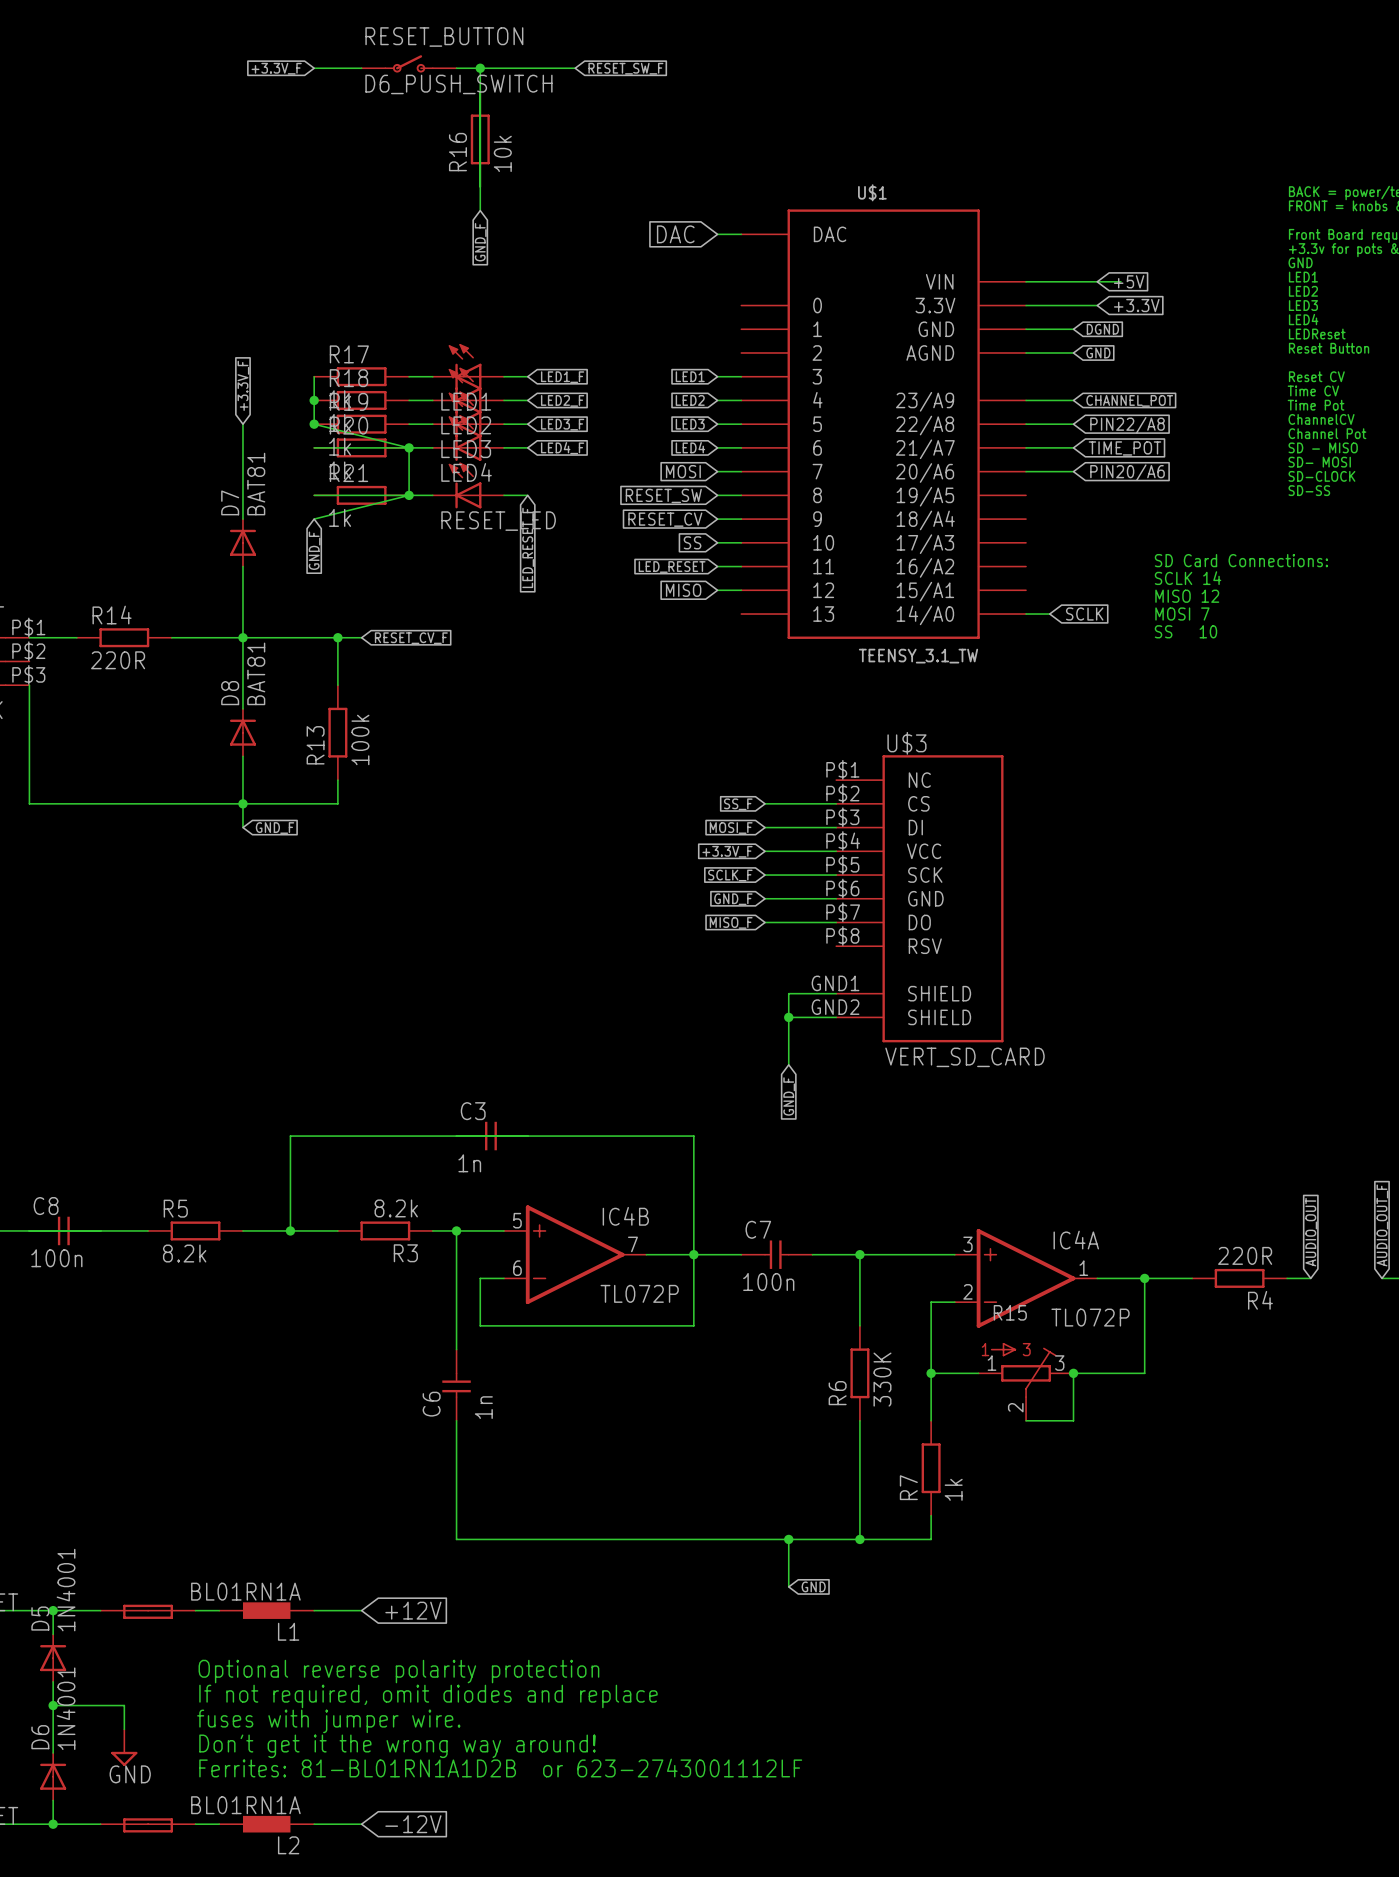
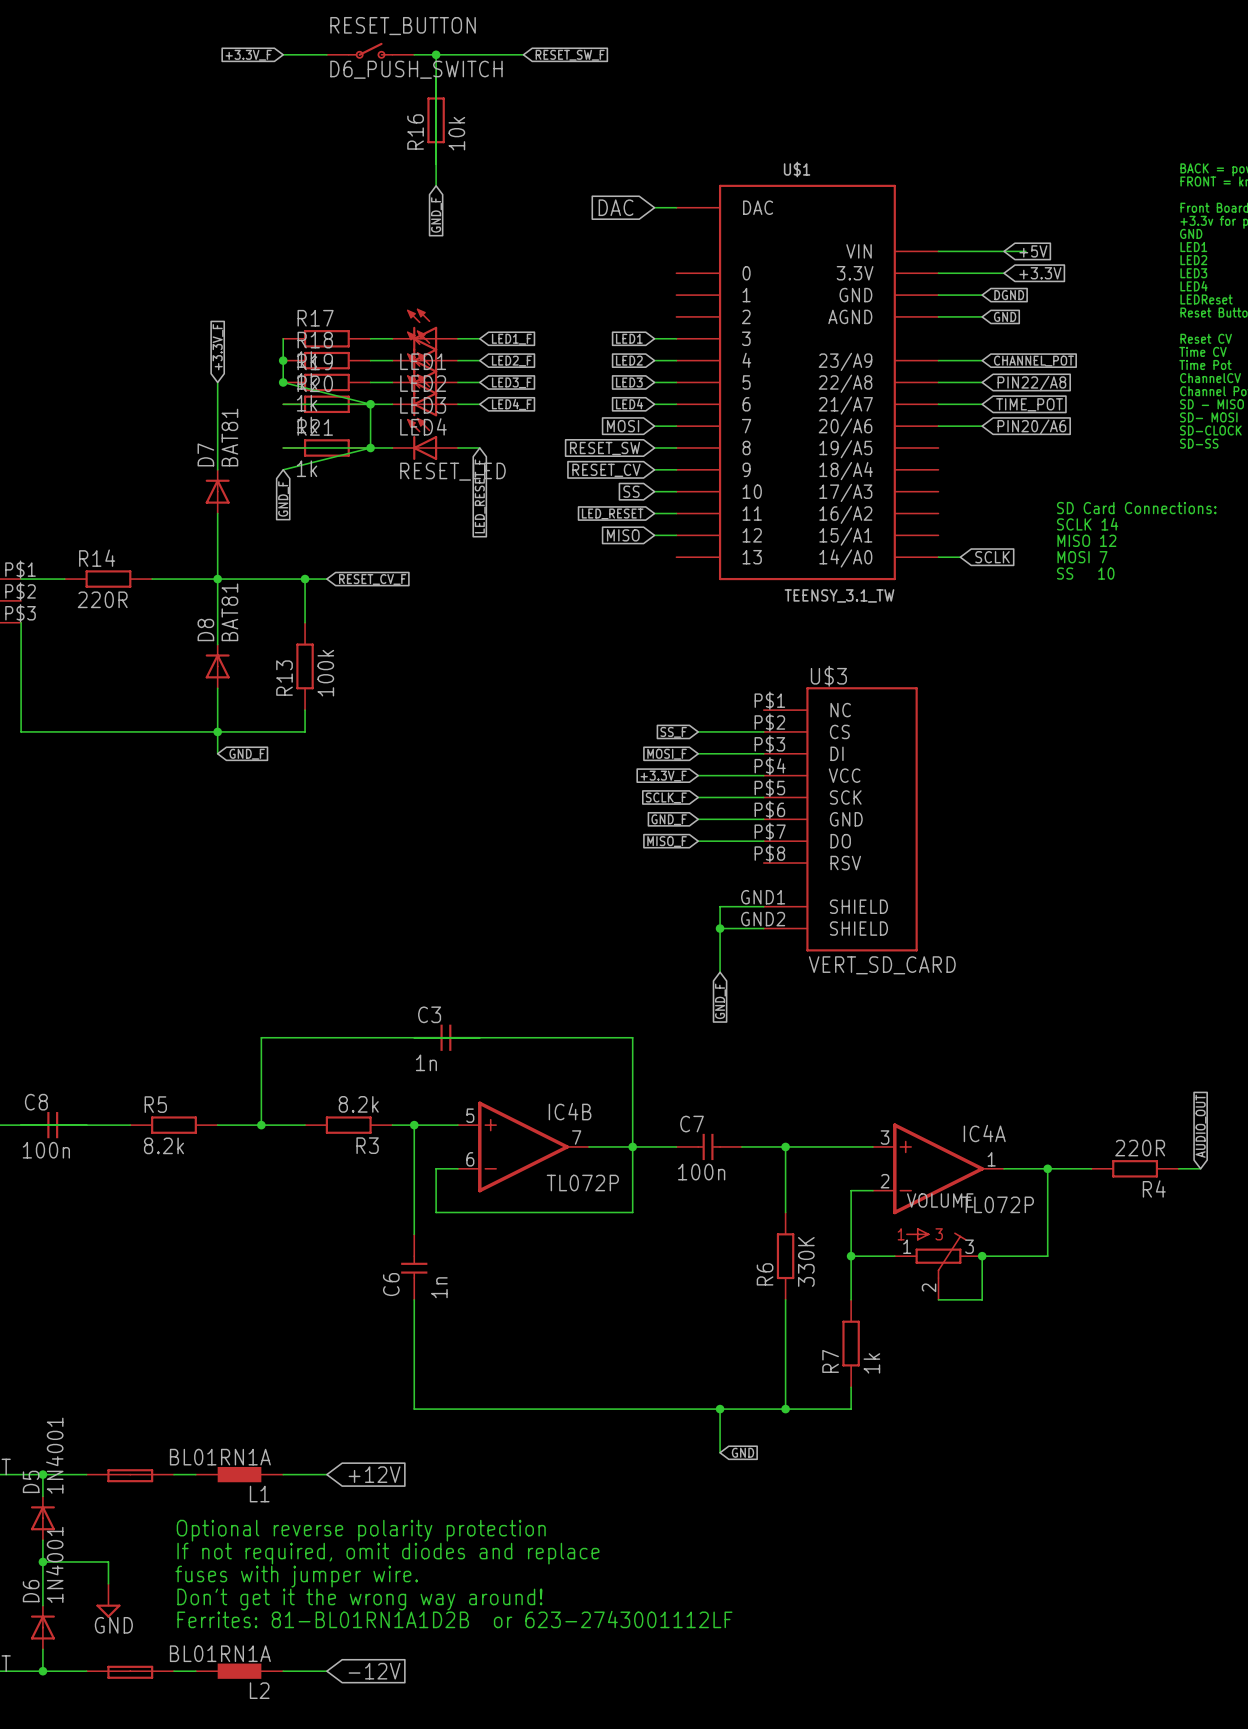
R15 name: R15 (1010, 1312) -> VOLUME (940, 1200)

